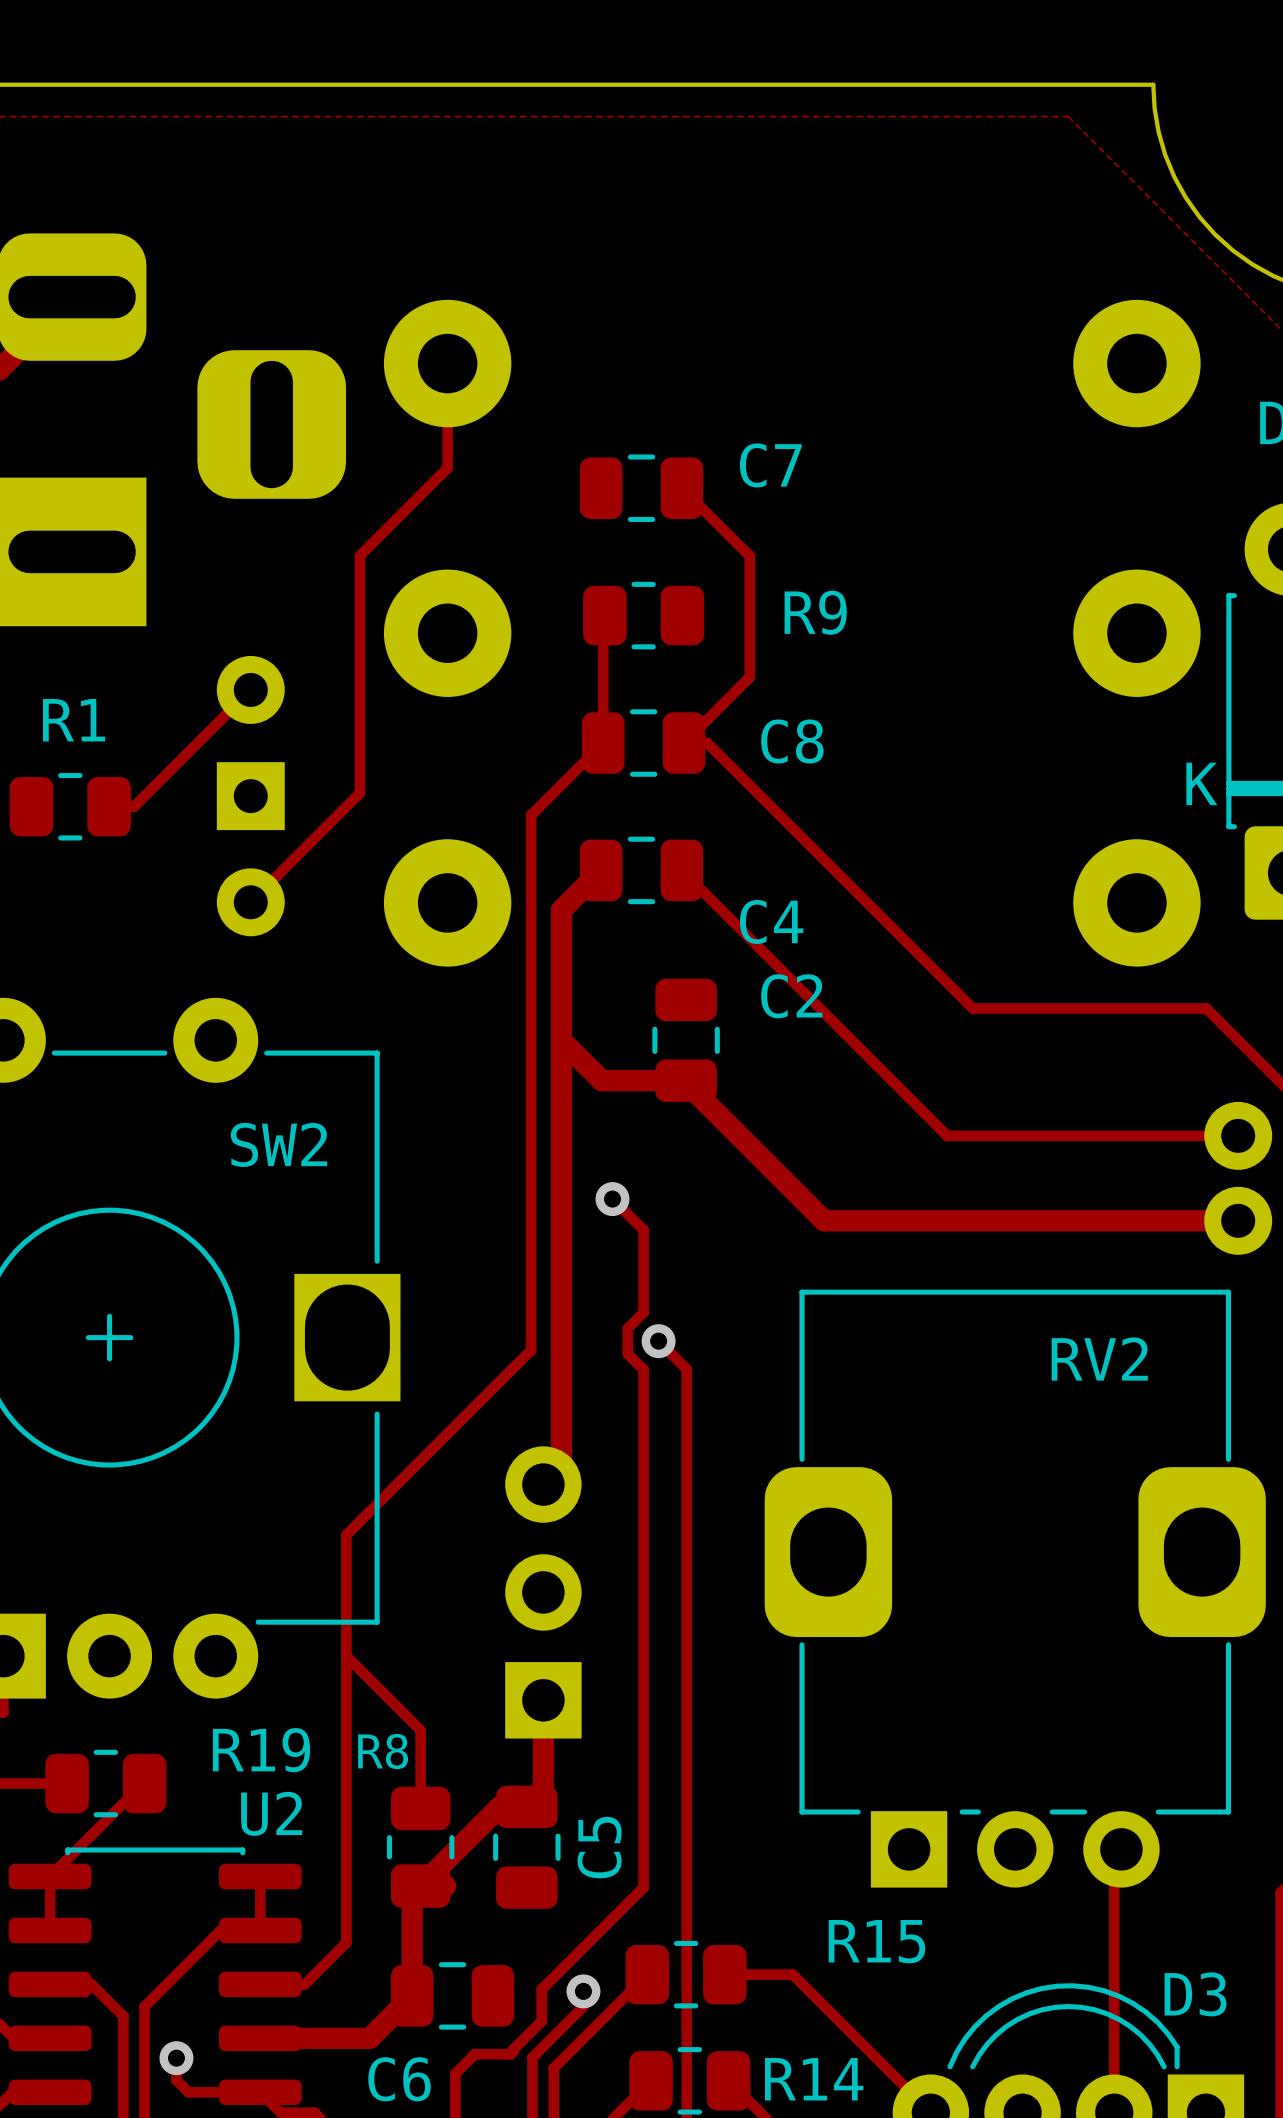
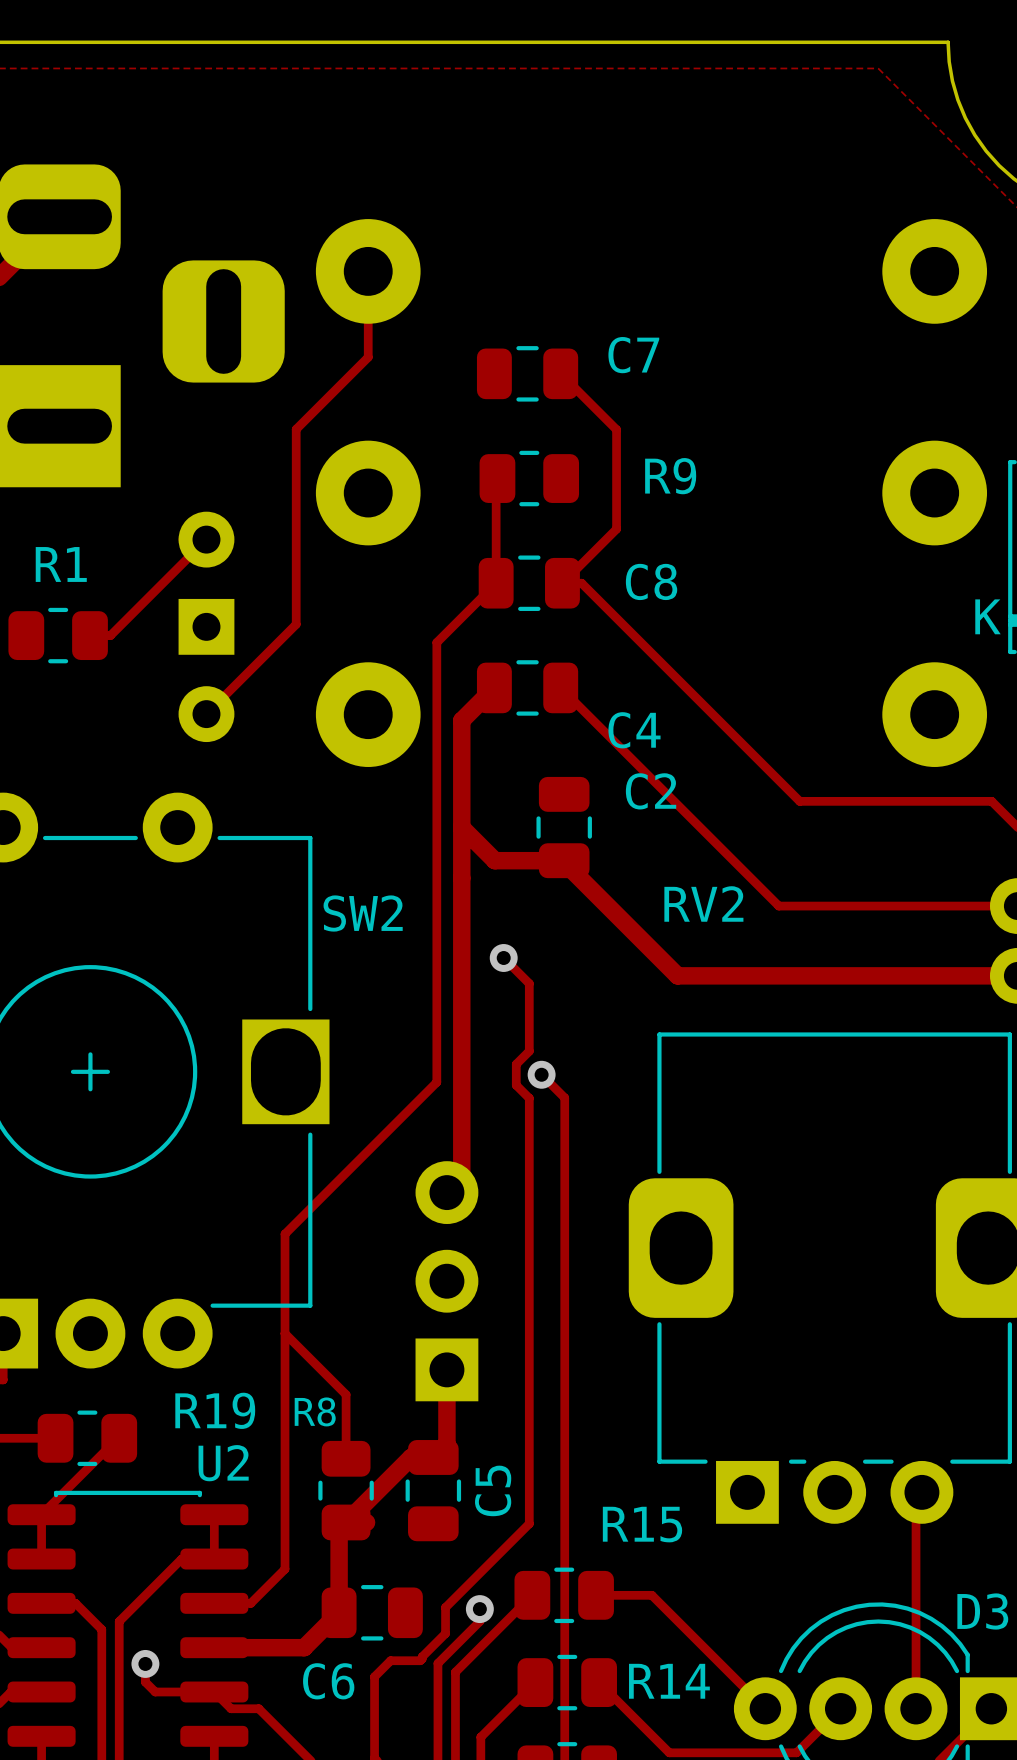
SW2 name position: SW2 (278, 1144) -> SW2 (363, 913)
RV2 name position: RV2 (1099, 1359) -> RV2 (703, 903)
R15 name position: R15 (876, 1941) -> R15 (642, 1524)

